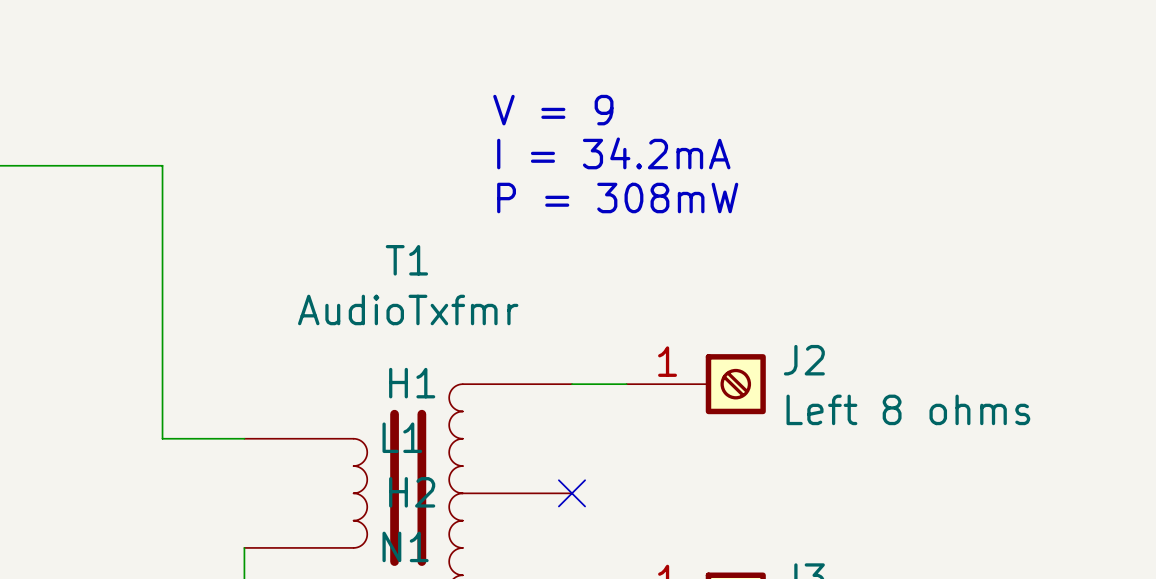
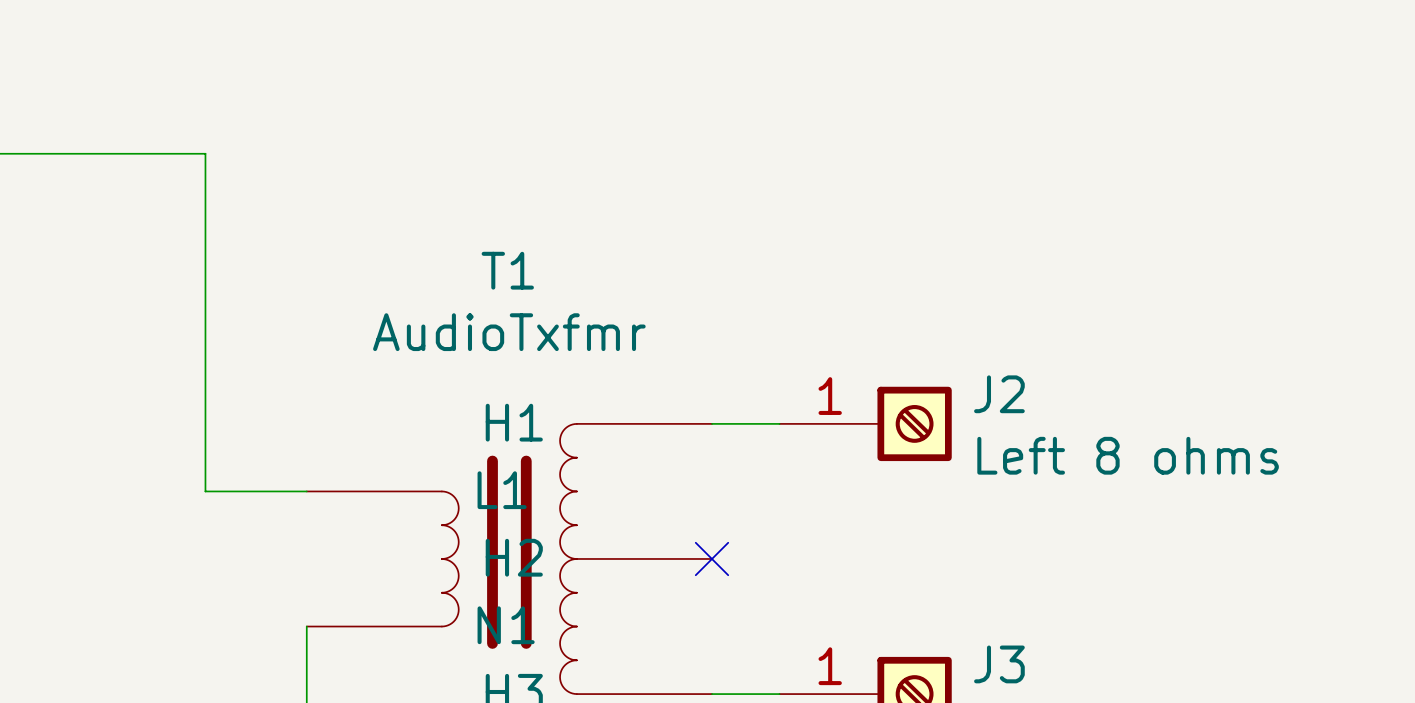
text: V = 9 (553, 110) -> none
text: I = 34.2mA (613, 153) -> none
text: P = 308mW (617, 198) -> none

